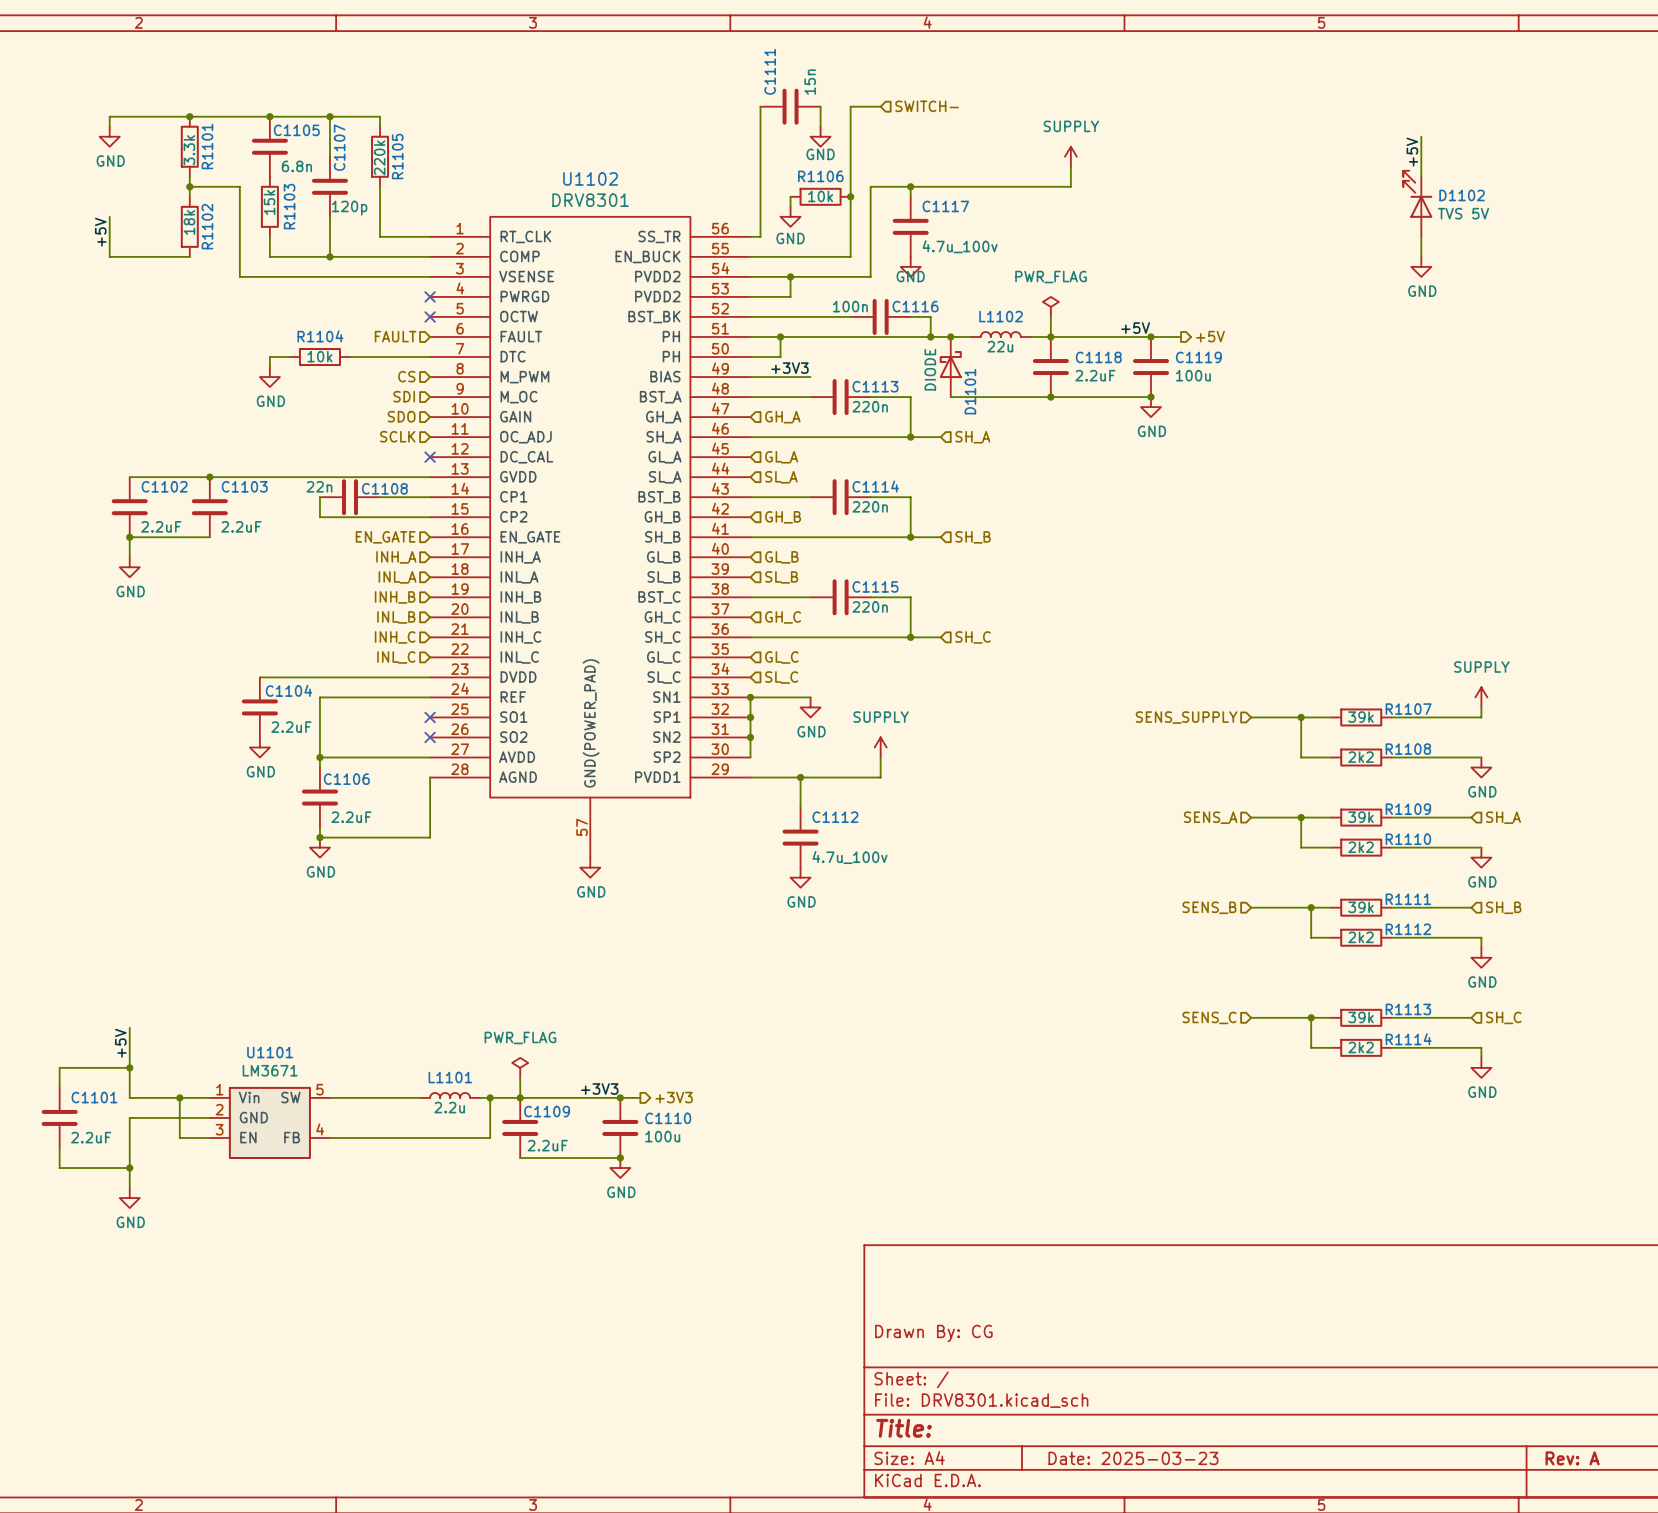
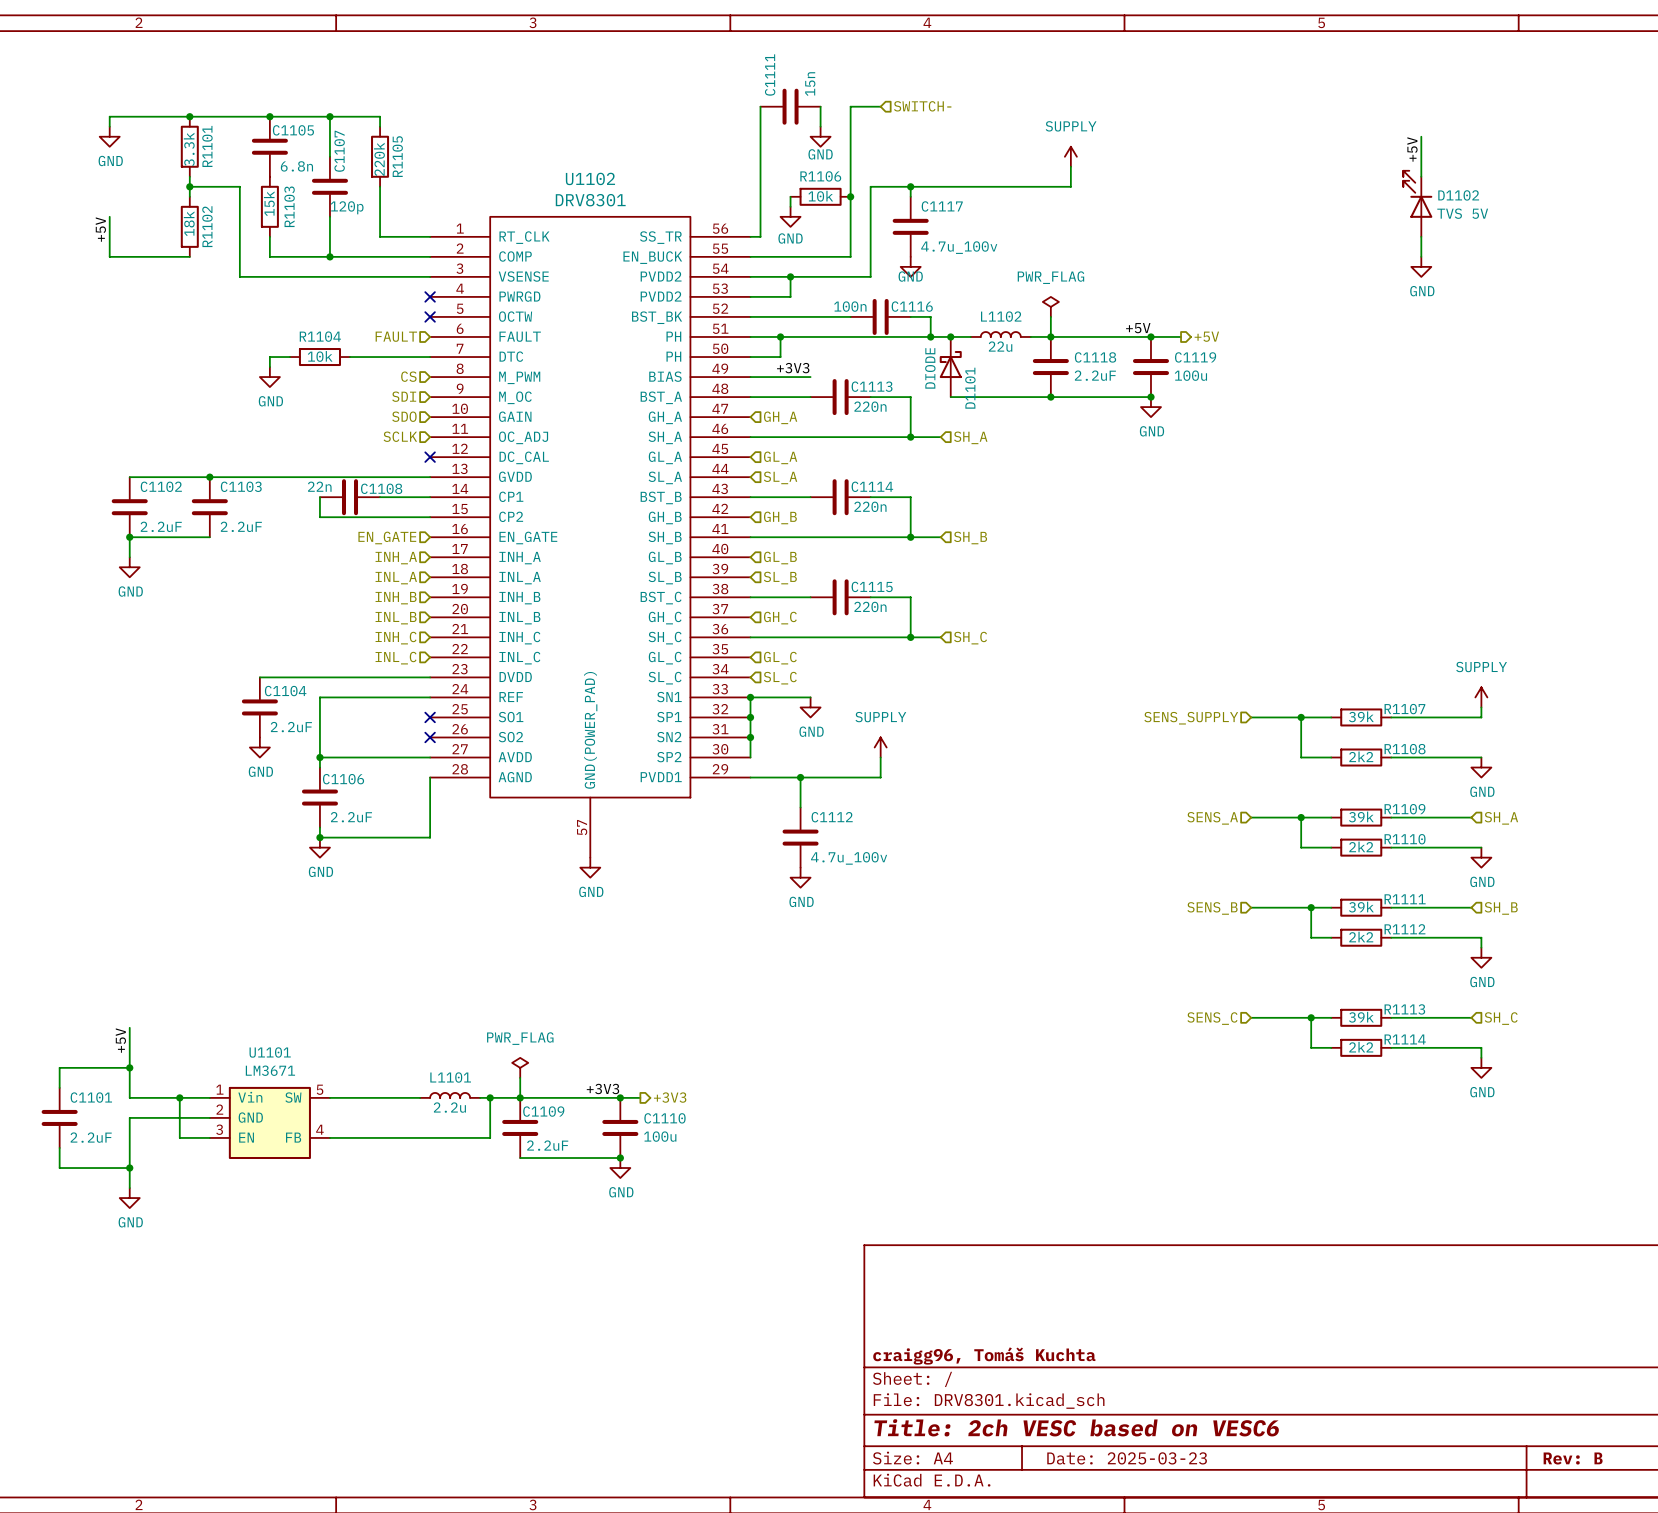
title block: Drawn By: CG (933, 1333) -> none
title block: none -> craigg96, Tomáš Kuchta (984, 1355)
title block: Title: (904, 1428) -> Title: 2ch VESC based on VESC6 (1076, 1427)
title block: Rev: A (1572, 1458) -> Rev: B (1573, 1458)

